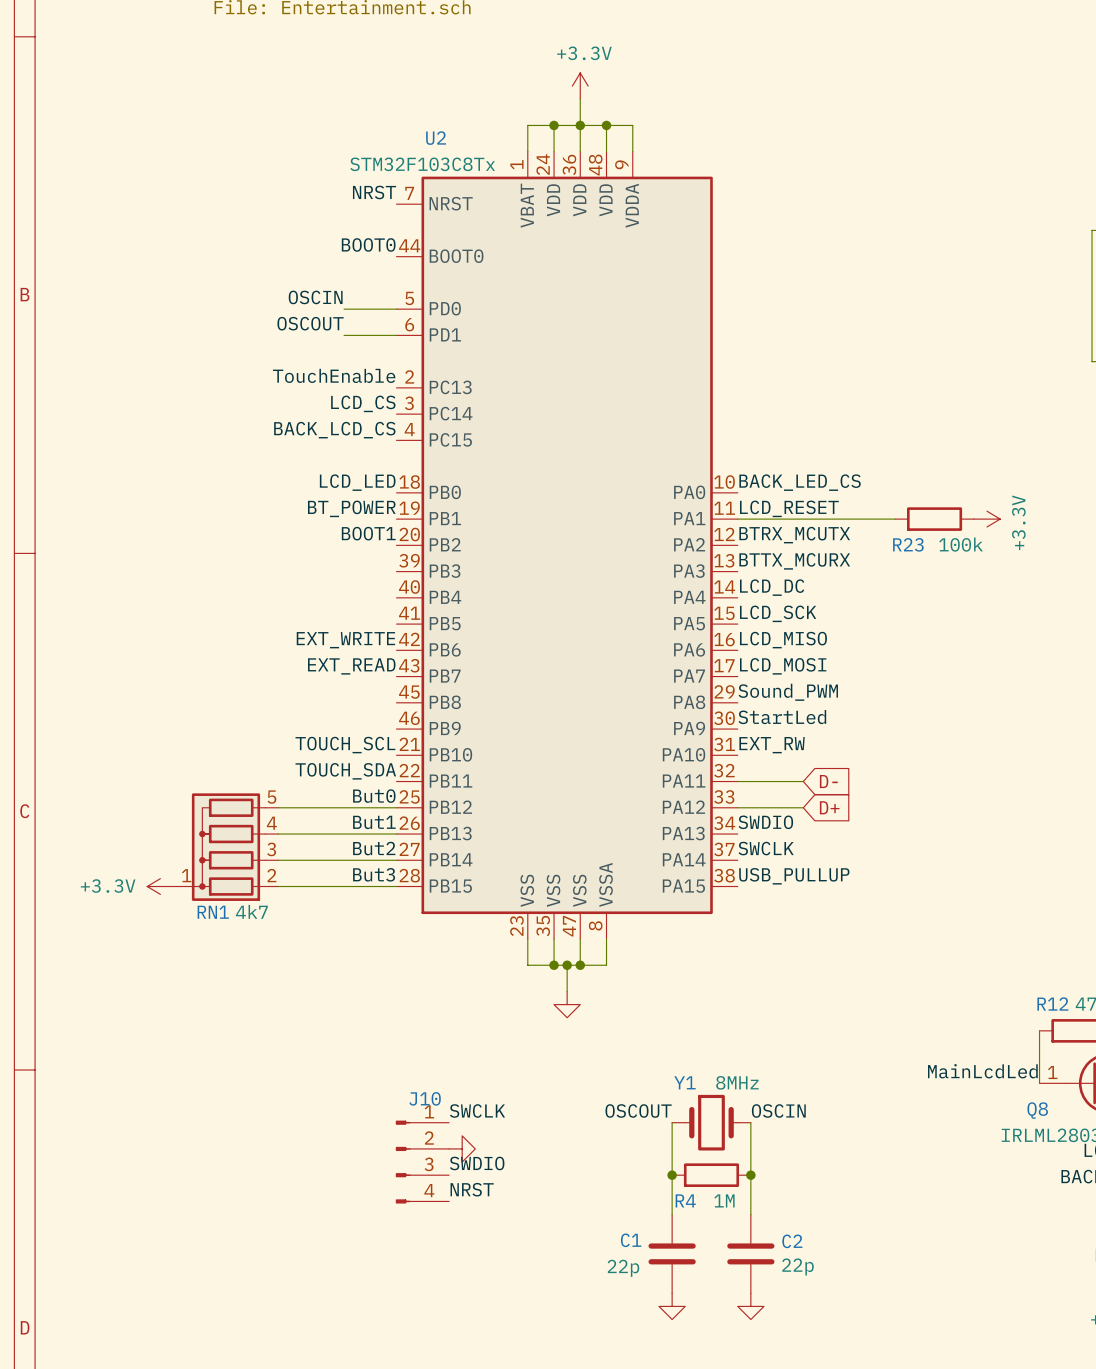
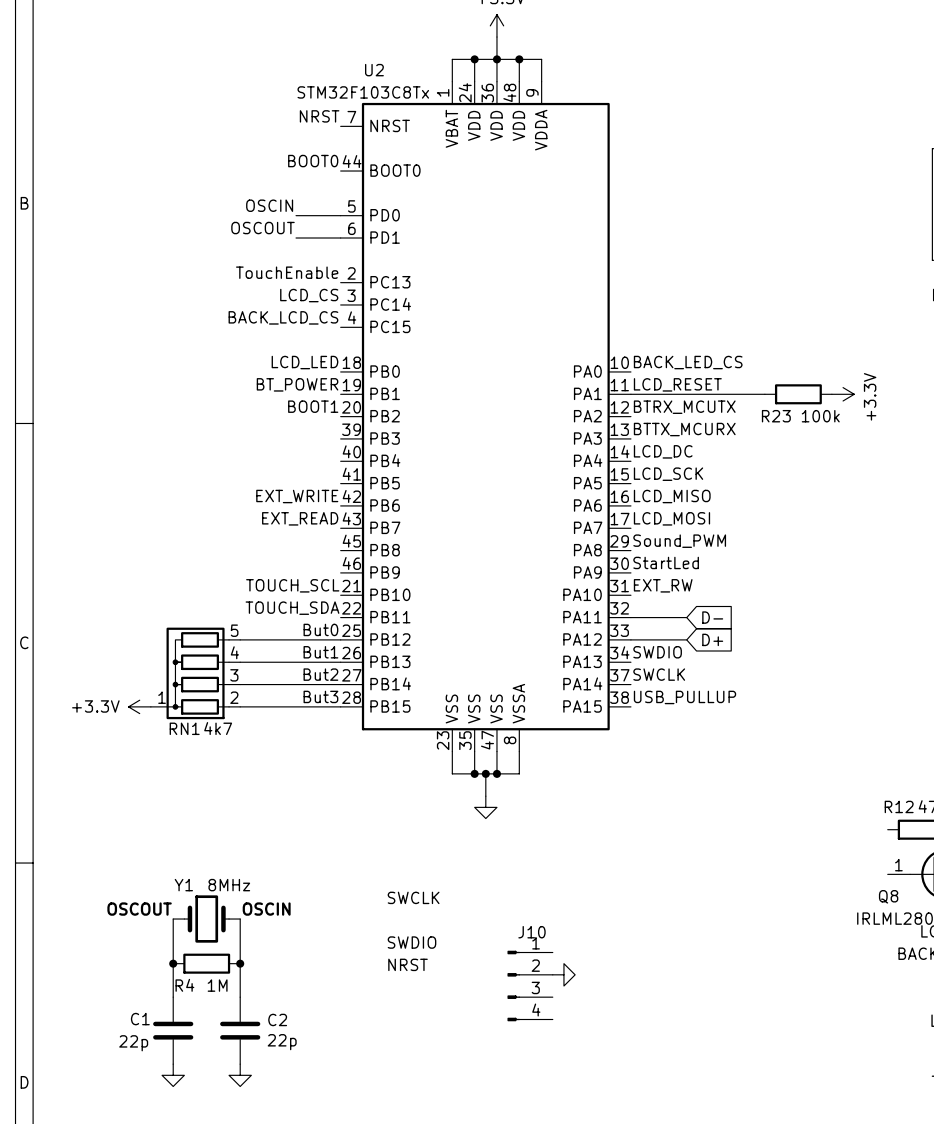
wire: (1039, 1030) (1039, 1083) -> none
label: MainLcdLed (982, 1071) -> none
label: OSCOUT (638, 1110) -> none
label: OSCIN (778, 1110) -> none
wire: (672, 1122) (672, 1214) -> none
Y1 position: (711, 1122) -> (206, 919)
wire: (750, 1122) (750, 1214) -> none
label: none -> OSCOUT (139, 909)
label: none -> OSCIN (266, 909)
wire: none -> (173, 919) (173, 997)
wire: none -> (240, 919) (240, 997)
power symbol: (462, 1148) -> none
J10 position: (422, 1162) -> (530, 986)
junction: (672, 1175) -> none
R4 position: (711, 1175) -> (206, 963)
junction: (750, 1175) -> none
junction: none -> (173, 963)
junction: none -> (240, 963)
power symbol: none -> (563, 974)
C1 position: (672, 1253) -> (173, 1030)
C2 position: (750, 1253) -> (240, 1030)
power symbol: (672, 1306) -> none
power symbol: (750, 1306) -> none
power symbol: none -> (173, 1075)
power symbol: none -> (240, 1075)

